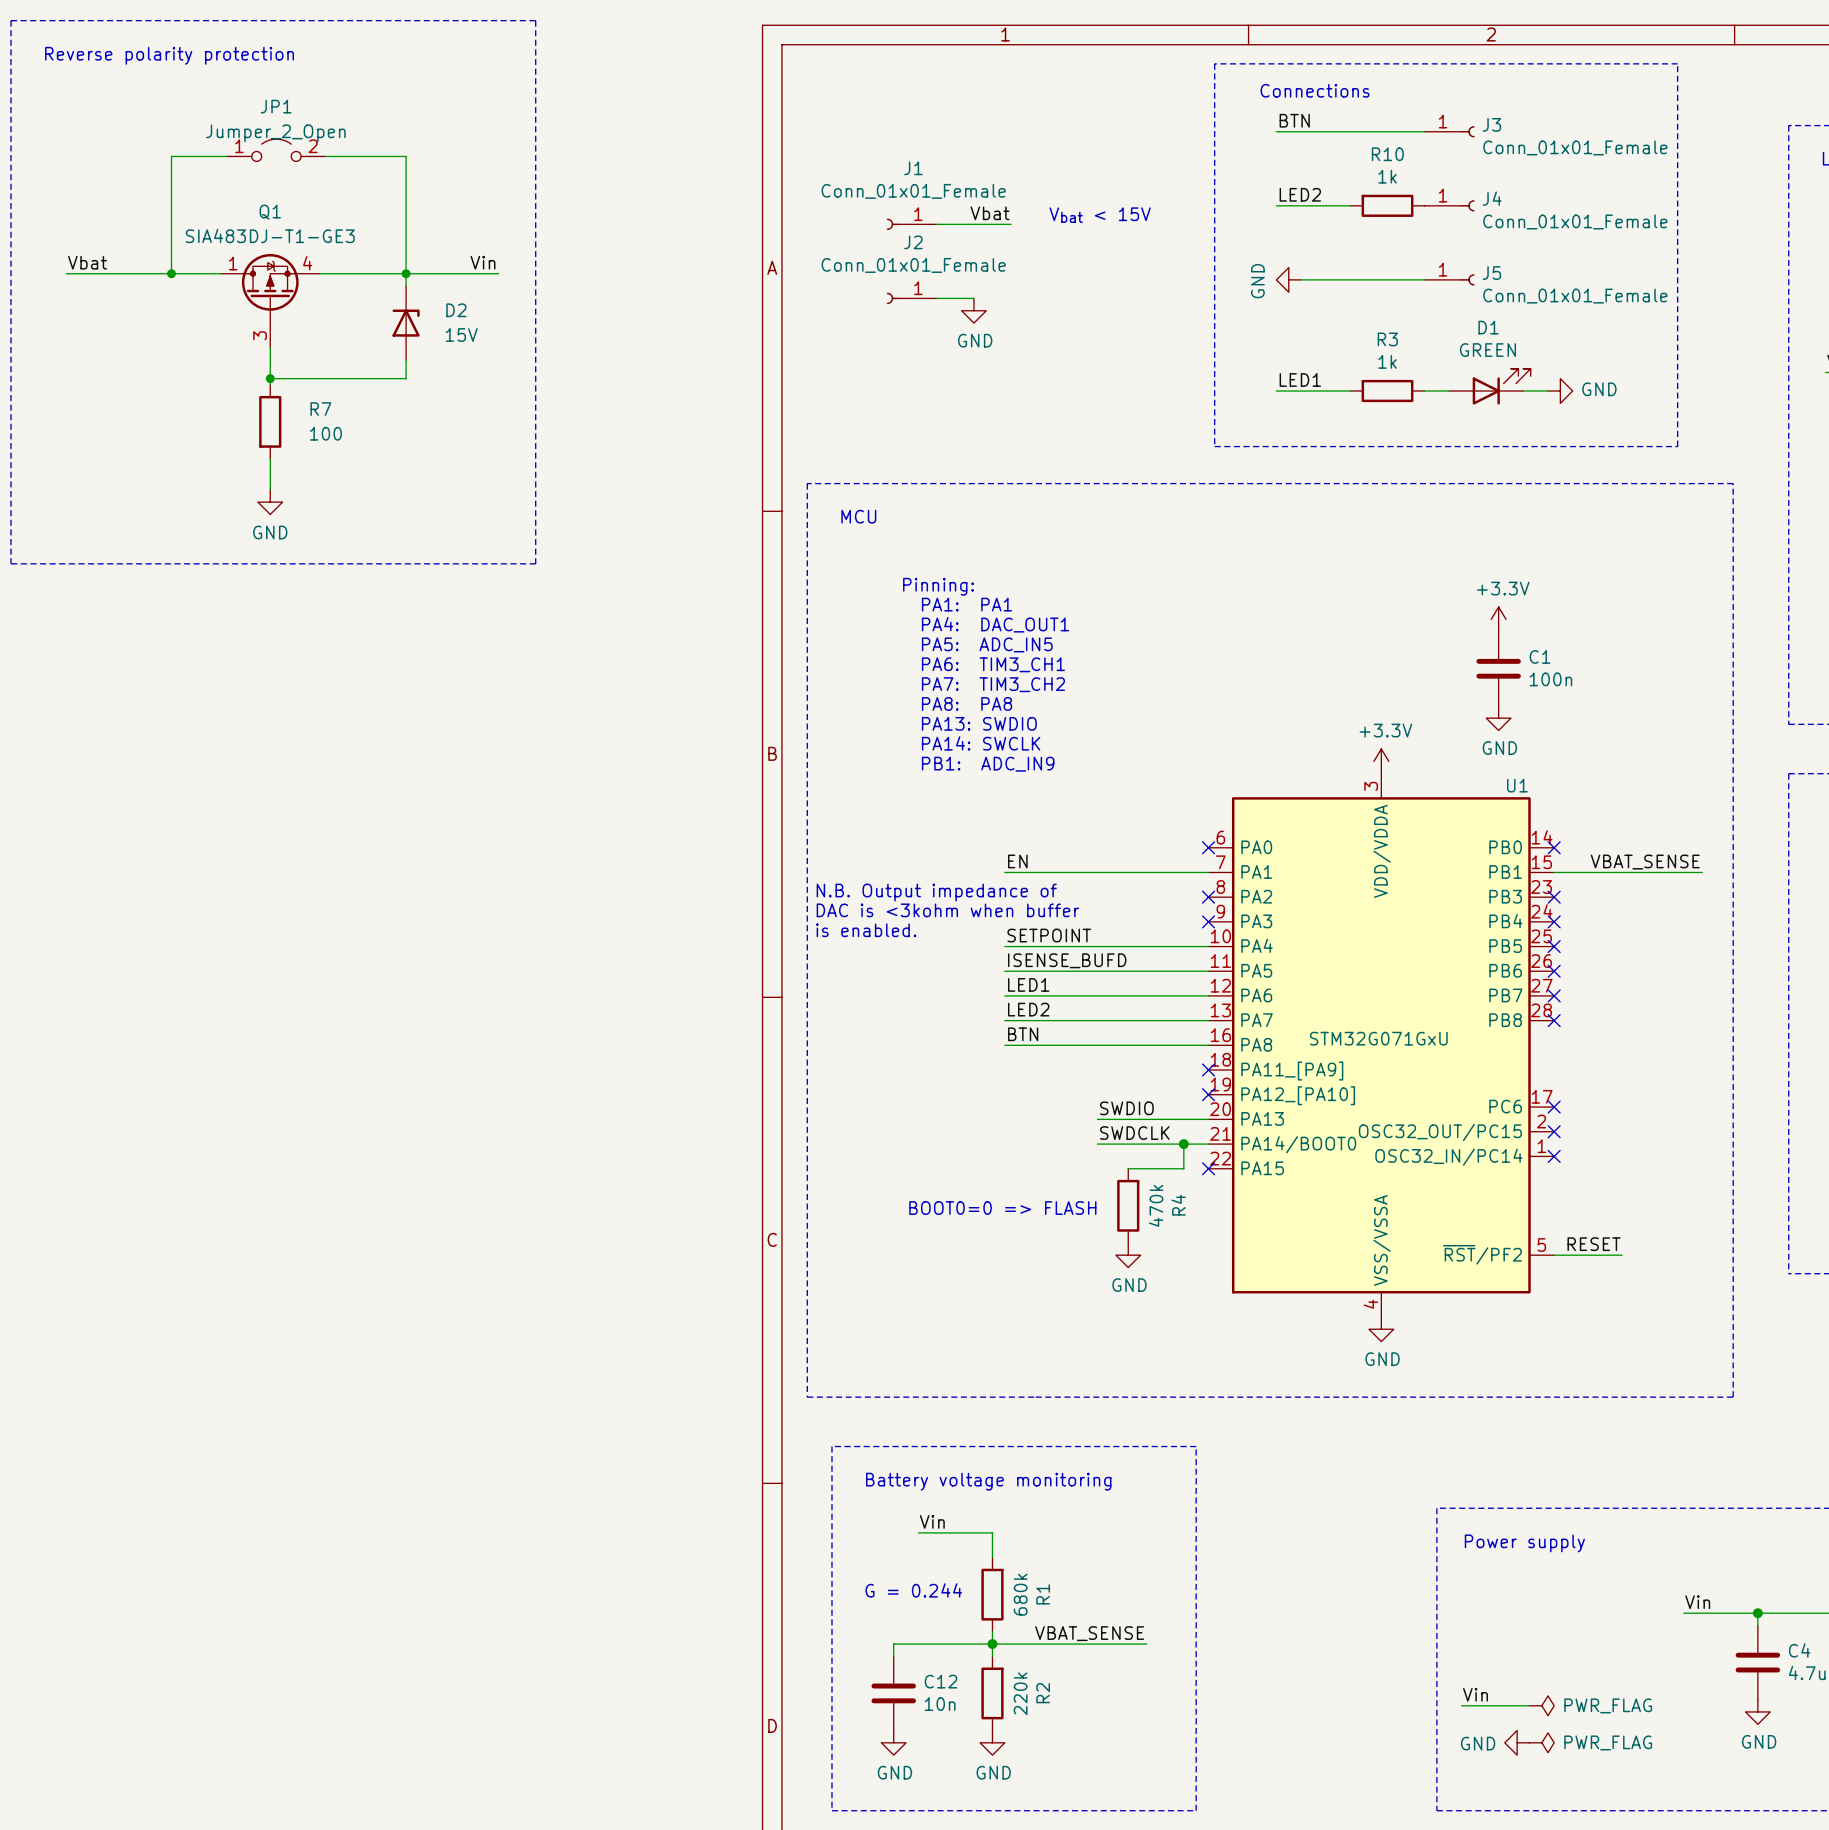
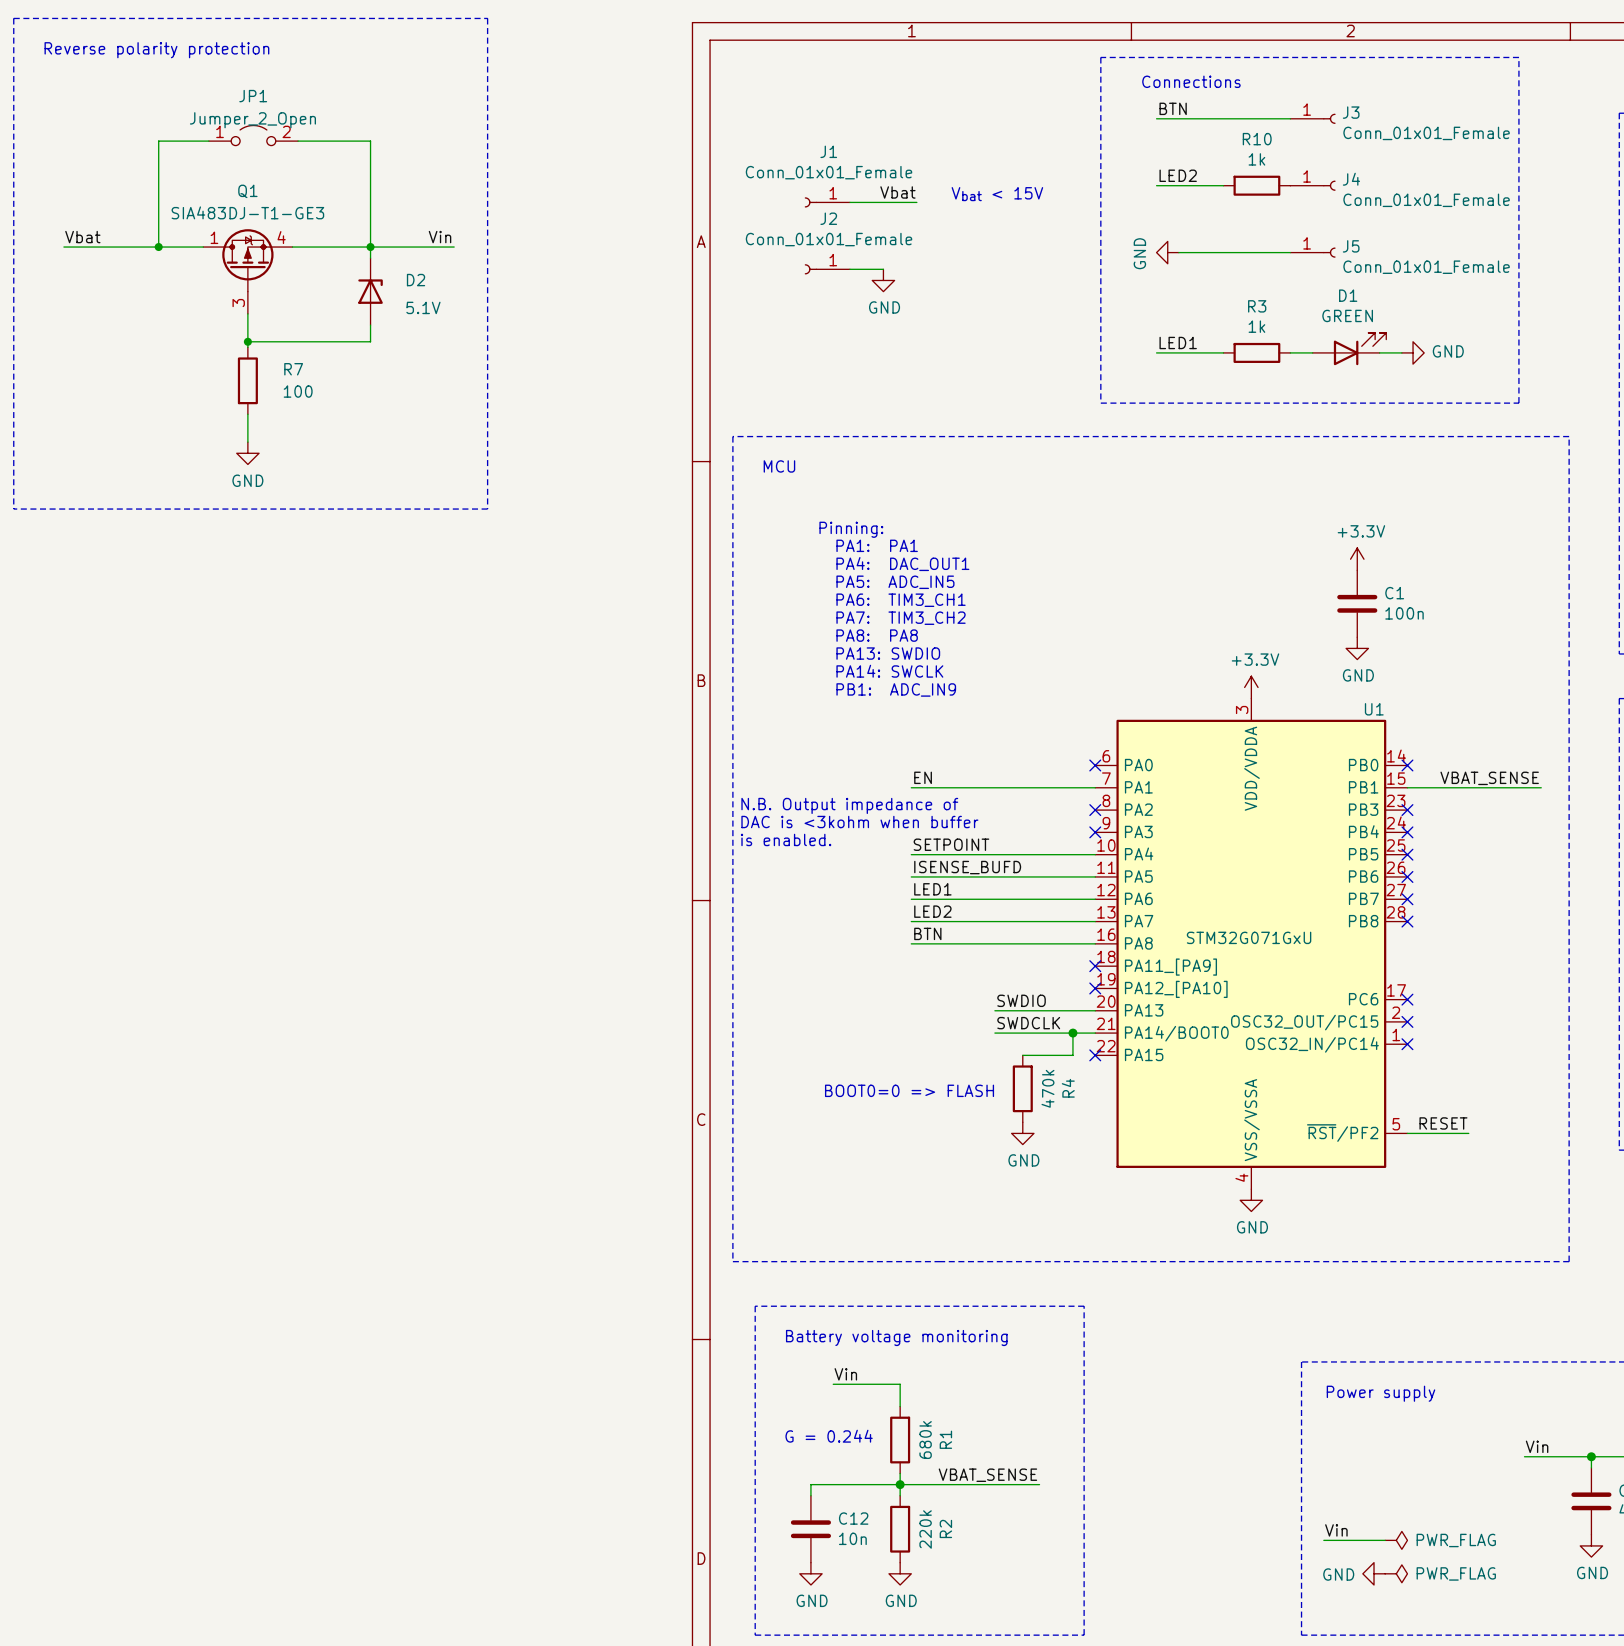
D2 value: 15V (461, 334) -> 5.1V (423, 307)

